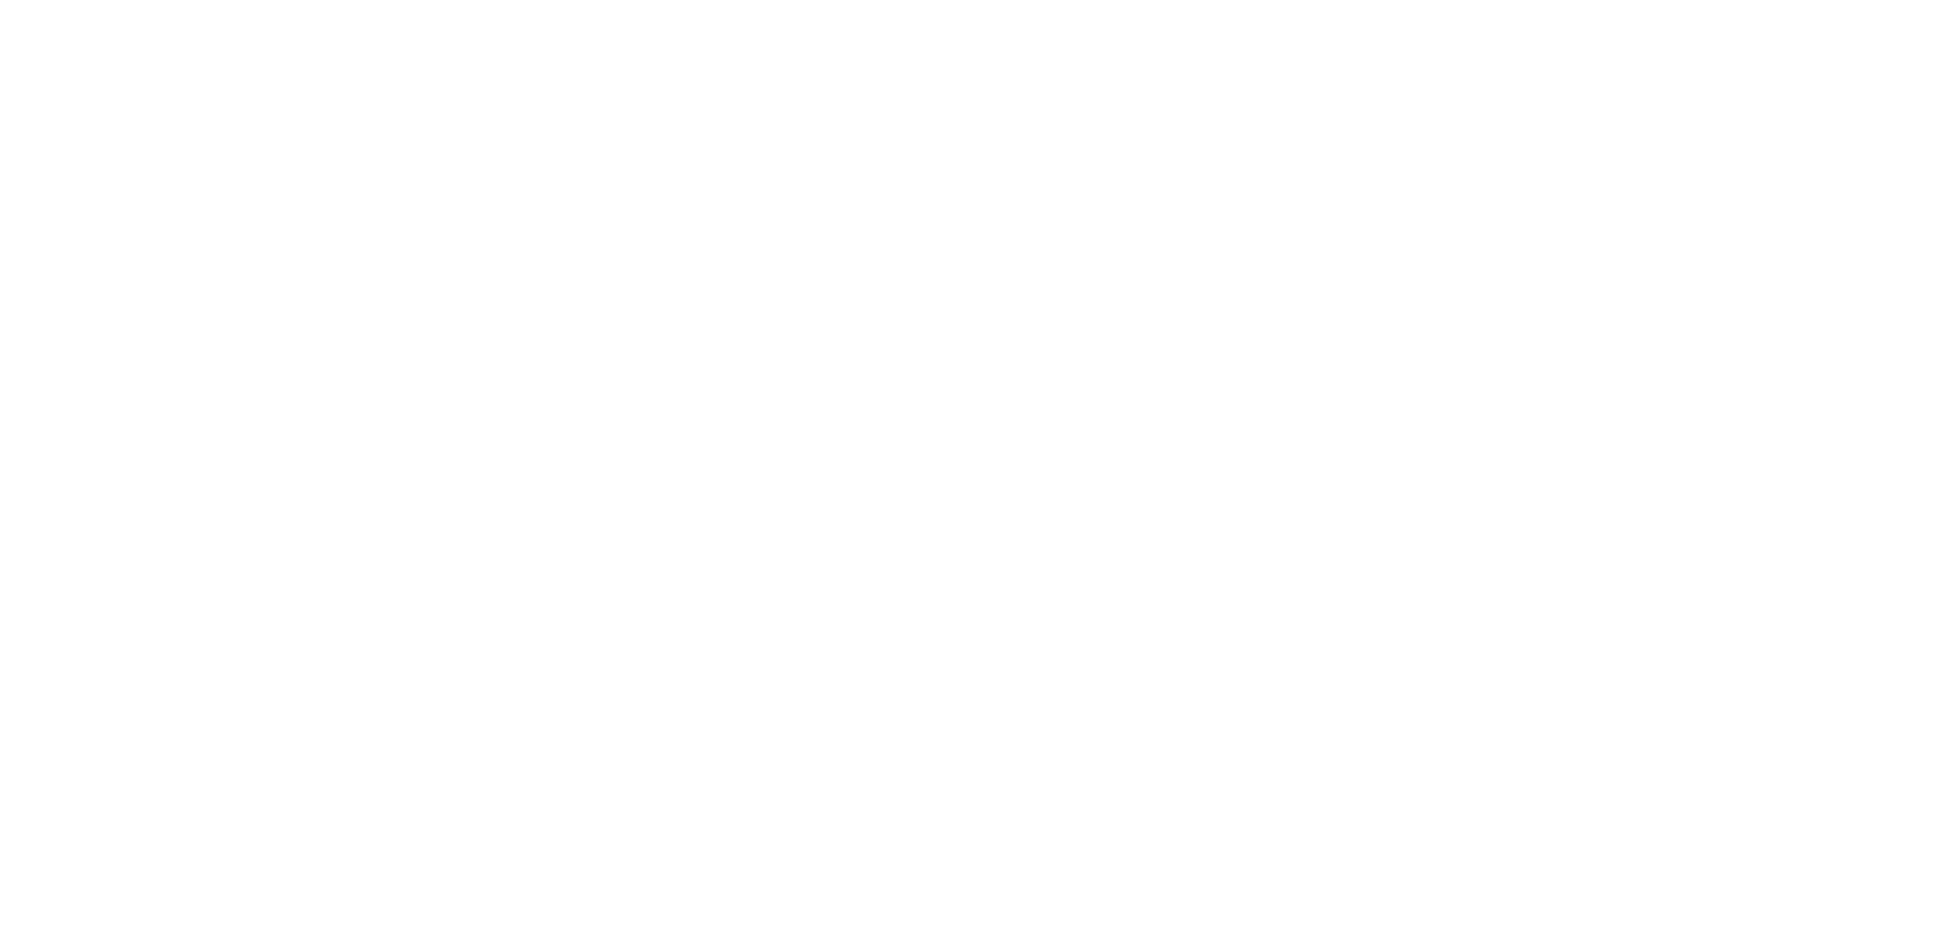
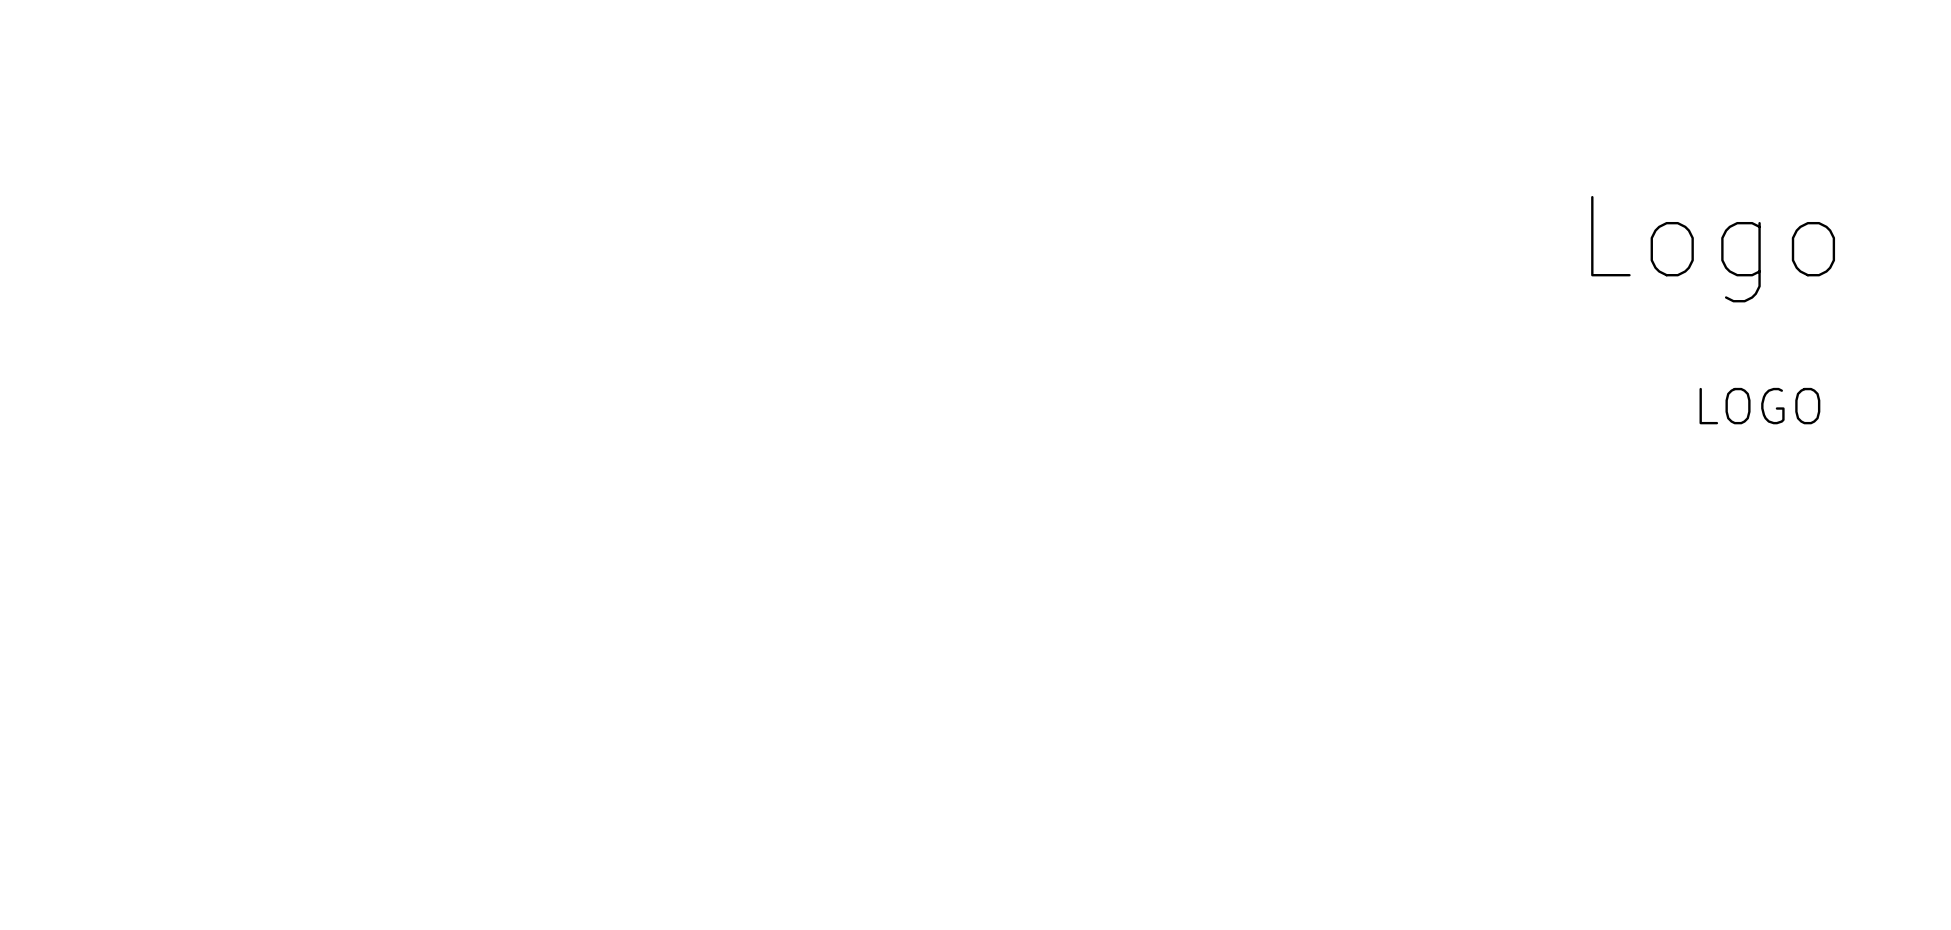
text: none -> Logo (1713, 249)
part: none -> (1759, 406)

